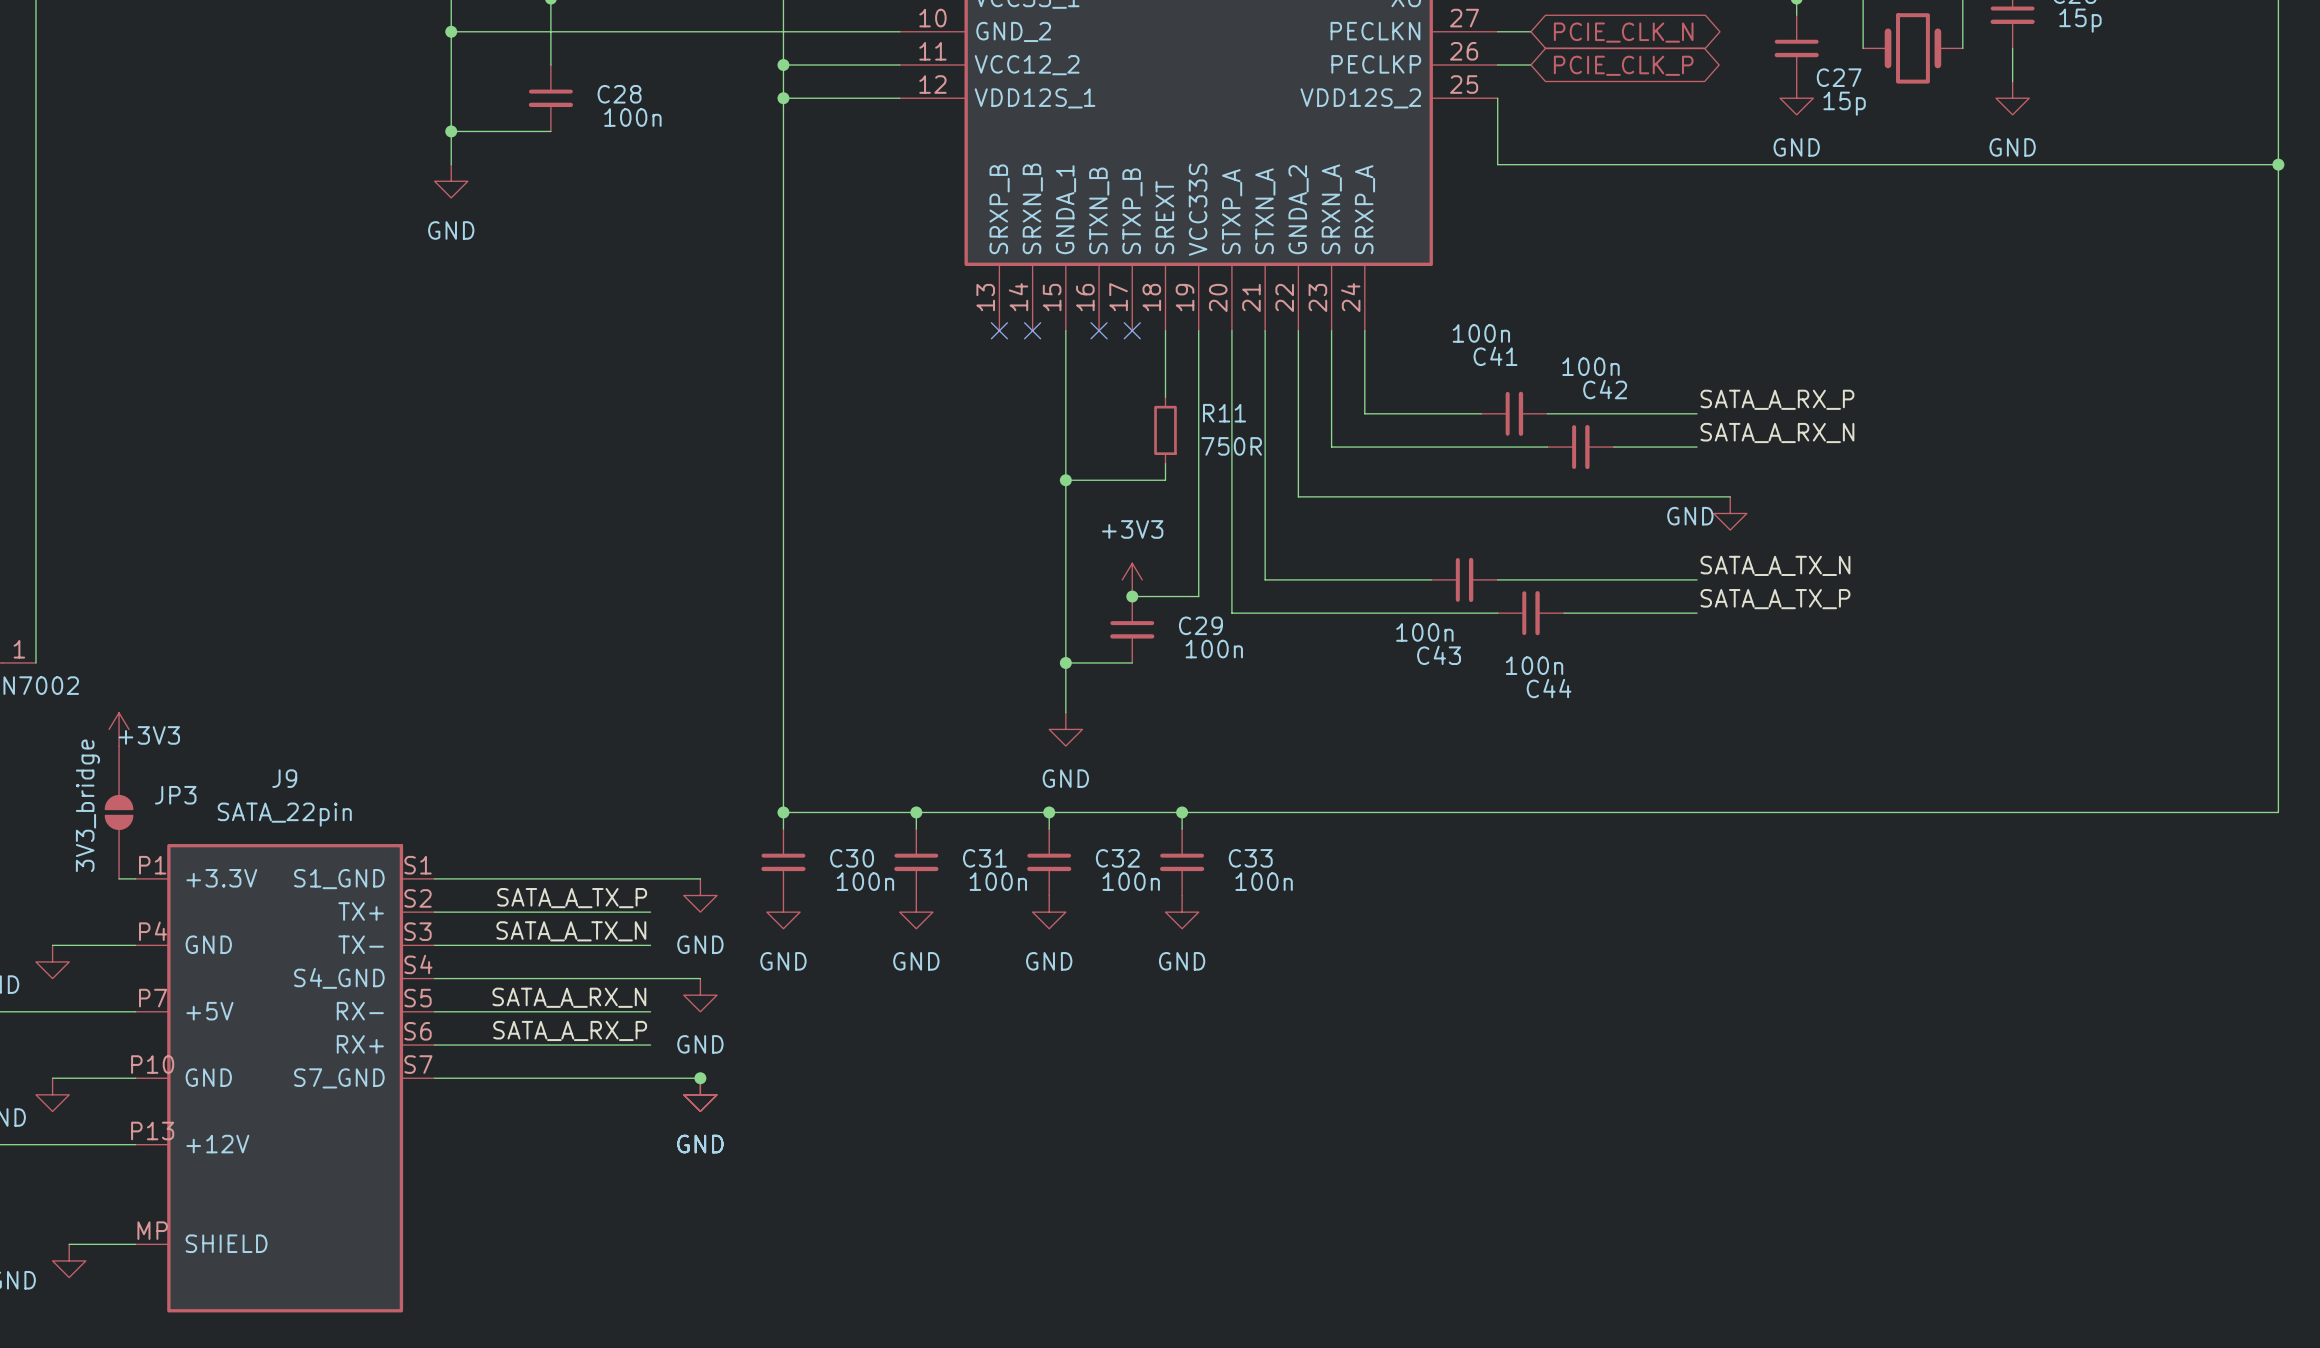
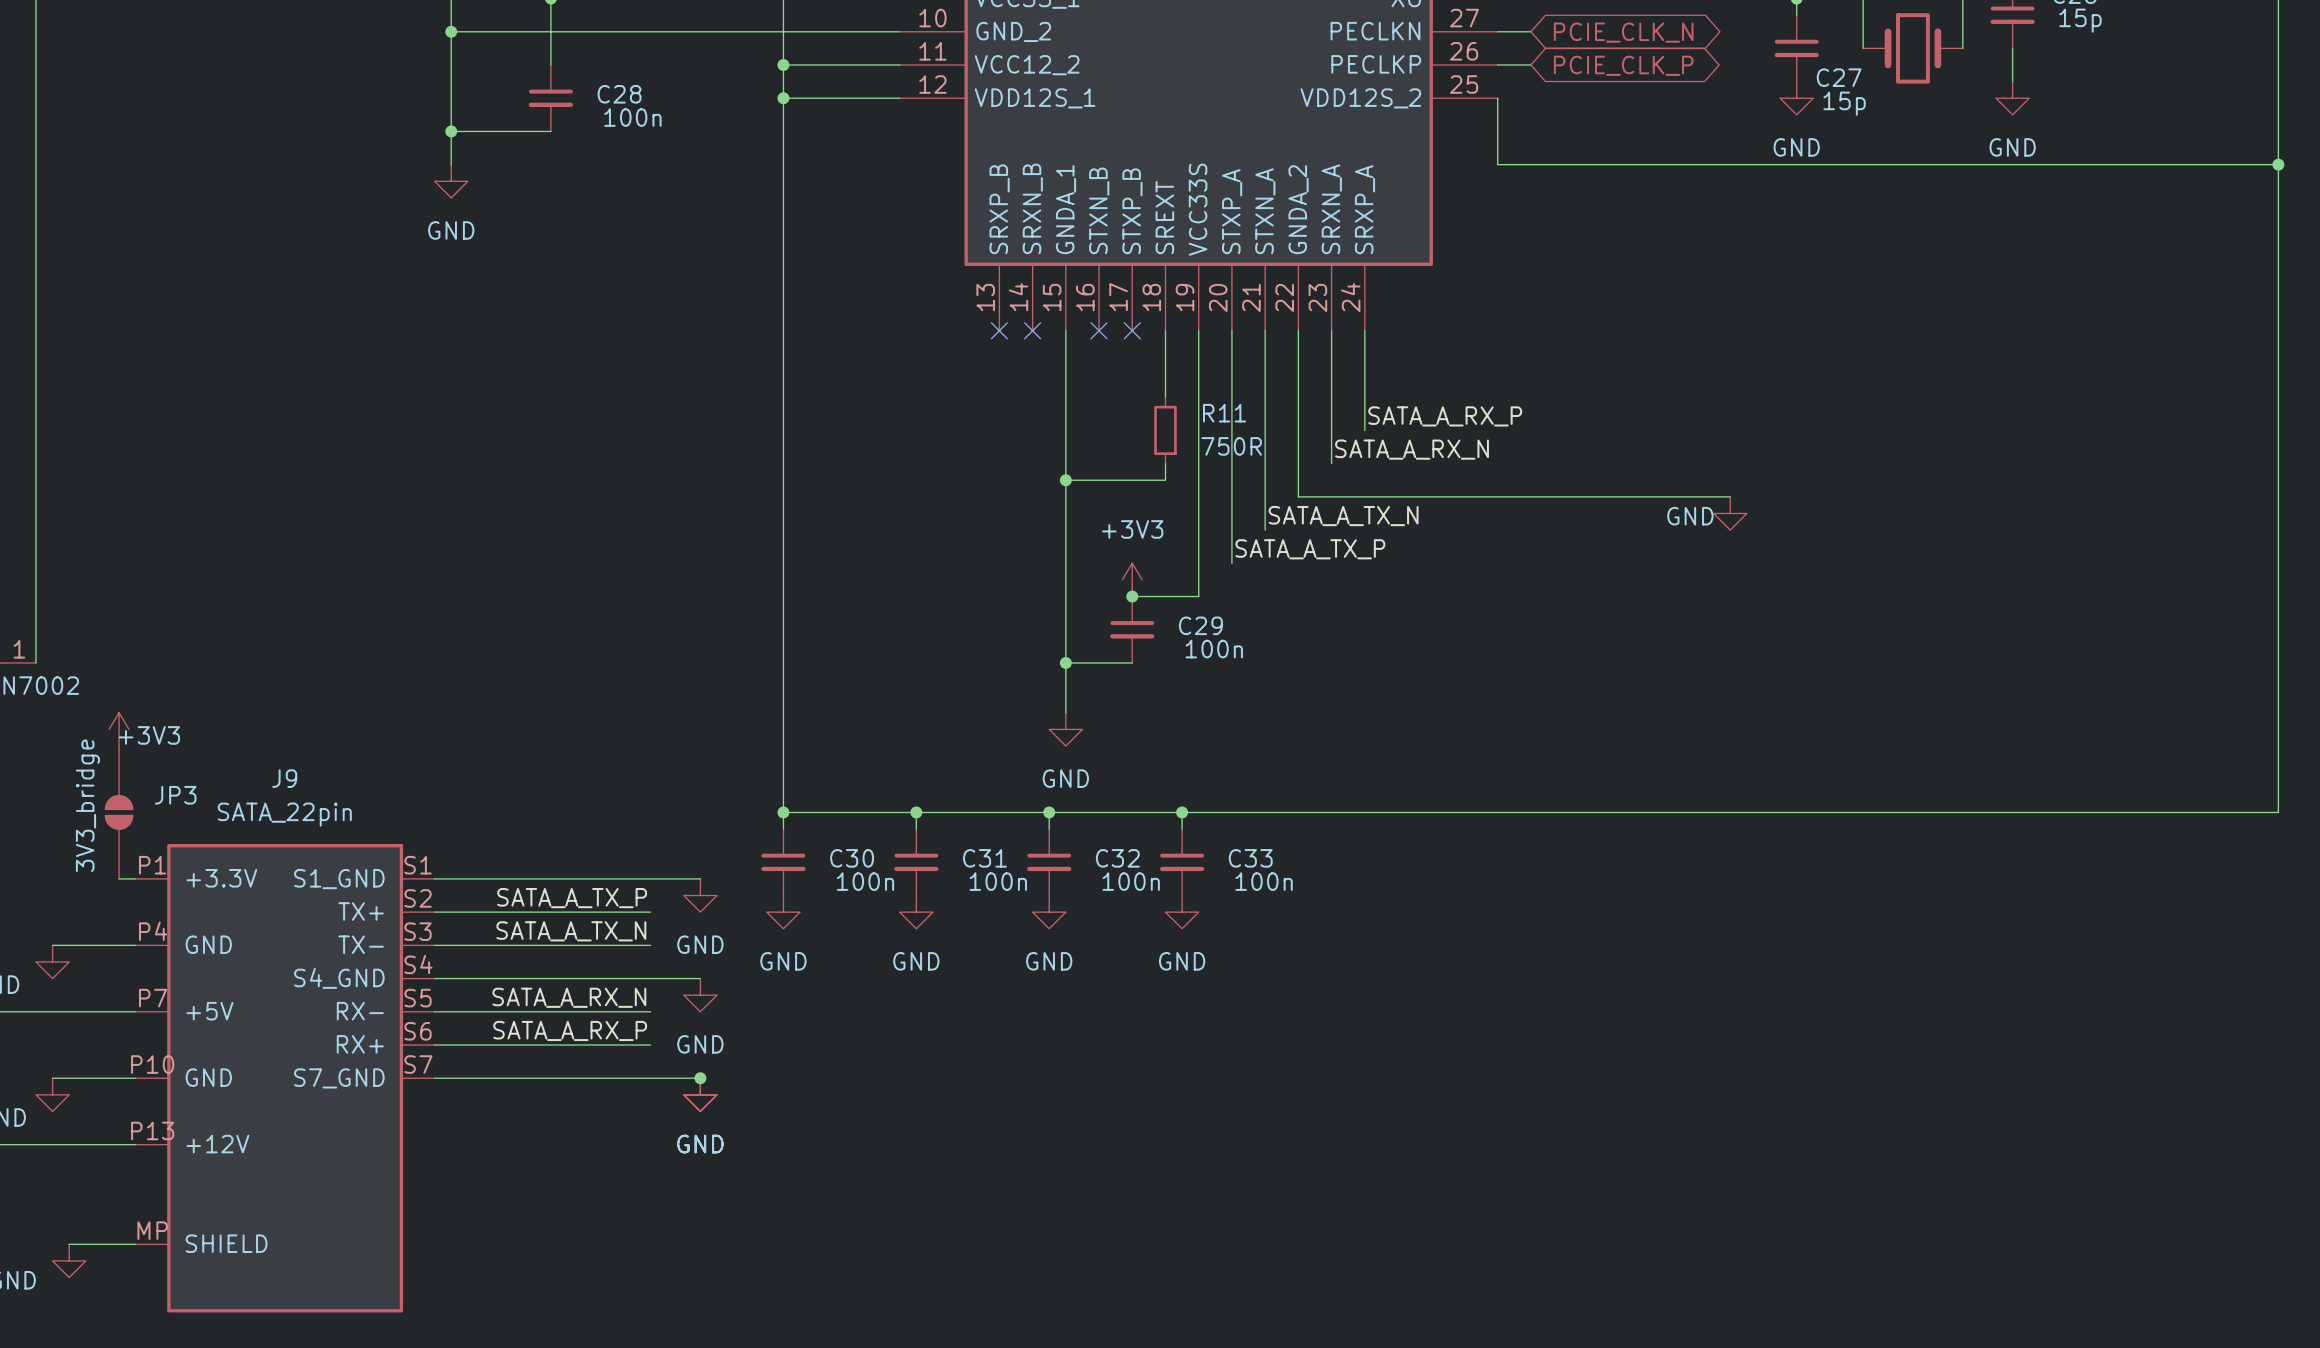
label: SATA_A_RX_P (1777, 399) -> none
wire: (1364, 413) (1481, 413) -> (1364, 413) (1364, 430)
C41: 100n (1514, 413) -> none
wire: (1547, 413) (1697, 413) -> none
label: none -> SATA_A_RX_P (1445, 416)
label: SATA_A_RX_N (1777, 433) -> none
wire: (1331, 447) (1547, 447) -> (1331, 447) (1331, 463)
C42: 100n (1580, 447) -> none
wire: (1613, 447) (1697, 447) -> none
label: none -> SATA_A_RX_N (1412, 449)
label: none -> SATA_A_TX_N (1343, 516)
wire: (1265, 530) (1265, 579) (1431, 579) -> none
label: none -> SATA_A_TX_P (1310, 549)
wire: (1231, 563) (1231, 613) (1497, 613) -> none
label: SATA_A_TX_N (1775, 565) -> none
C43: 100n (1464, 579) -> none
wire: (1497, 579) (1697, 579) -> none
label: SATA_A_TX_P (1775, 599) -> none
C44: 100n (1530, 613) -> none
wire: (1564, 613) (1697, 613) -> none

